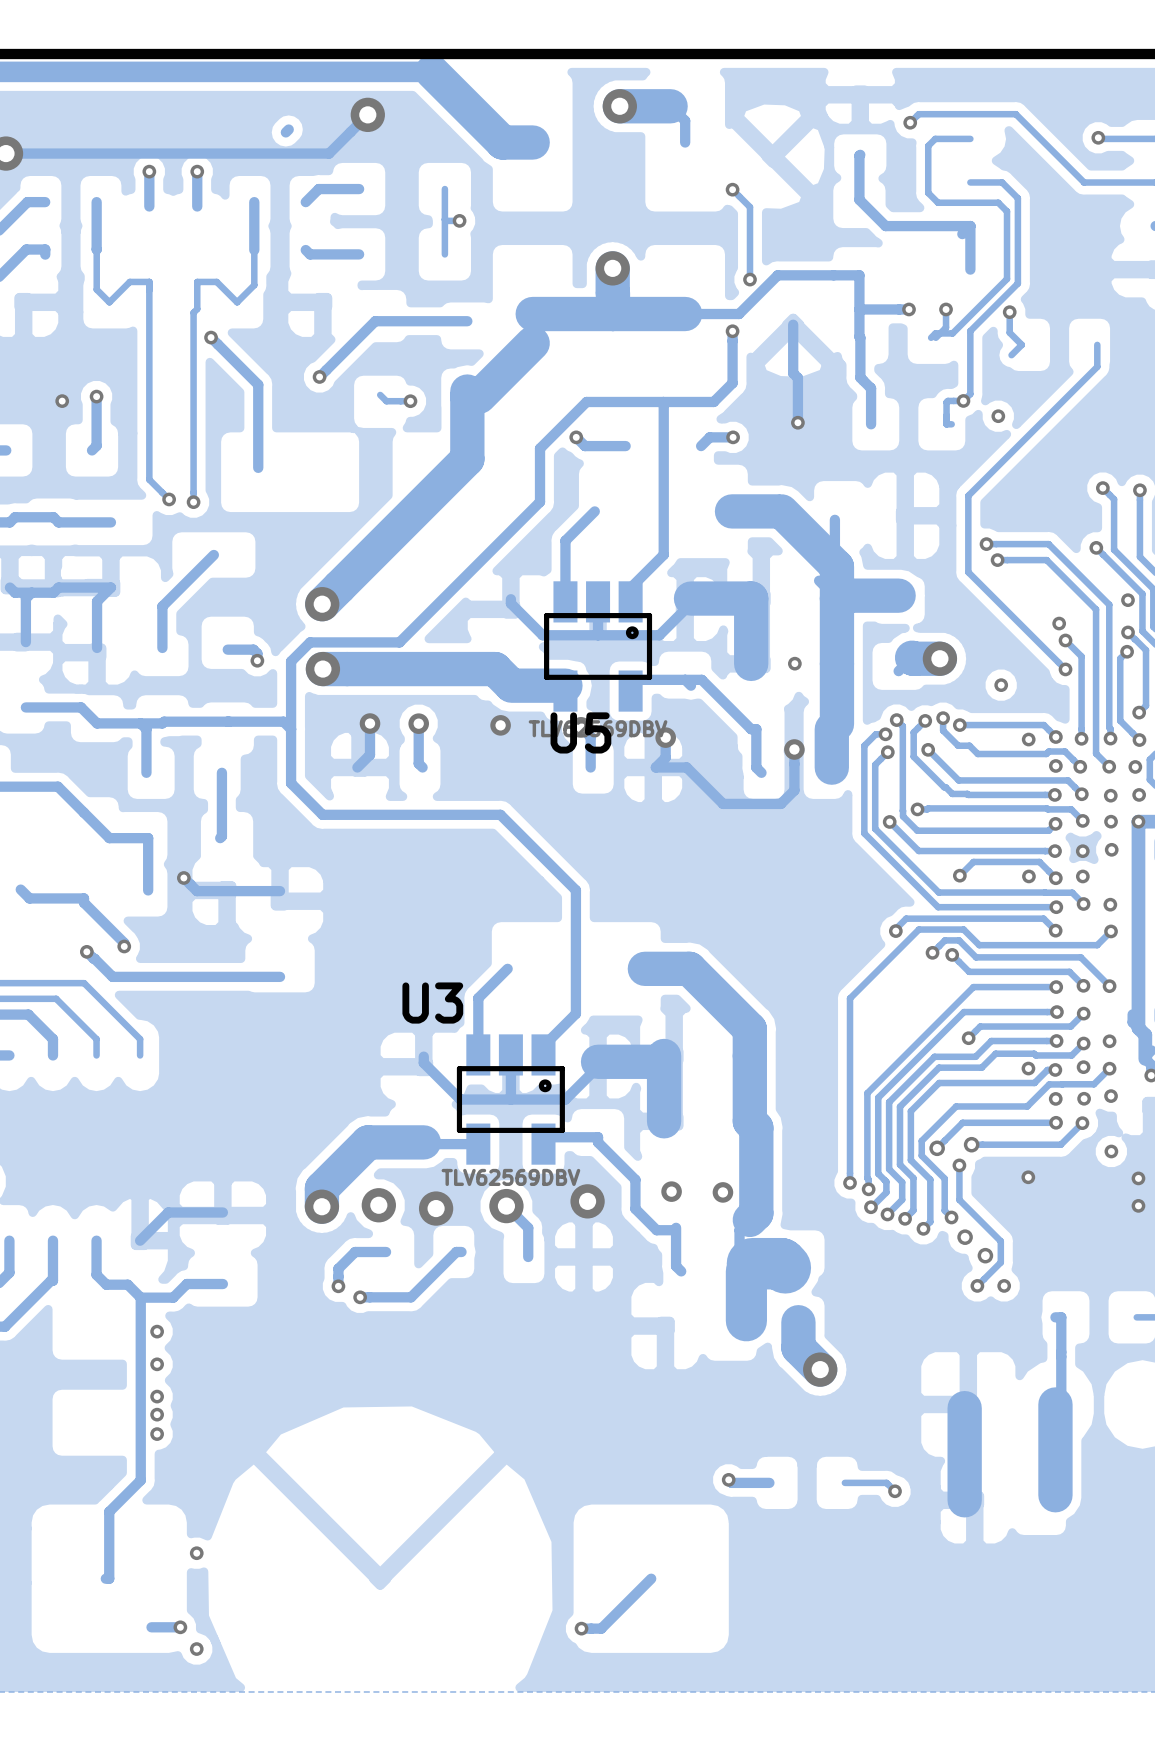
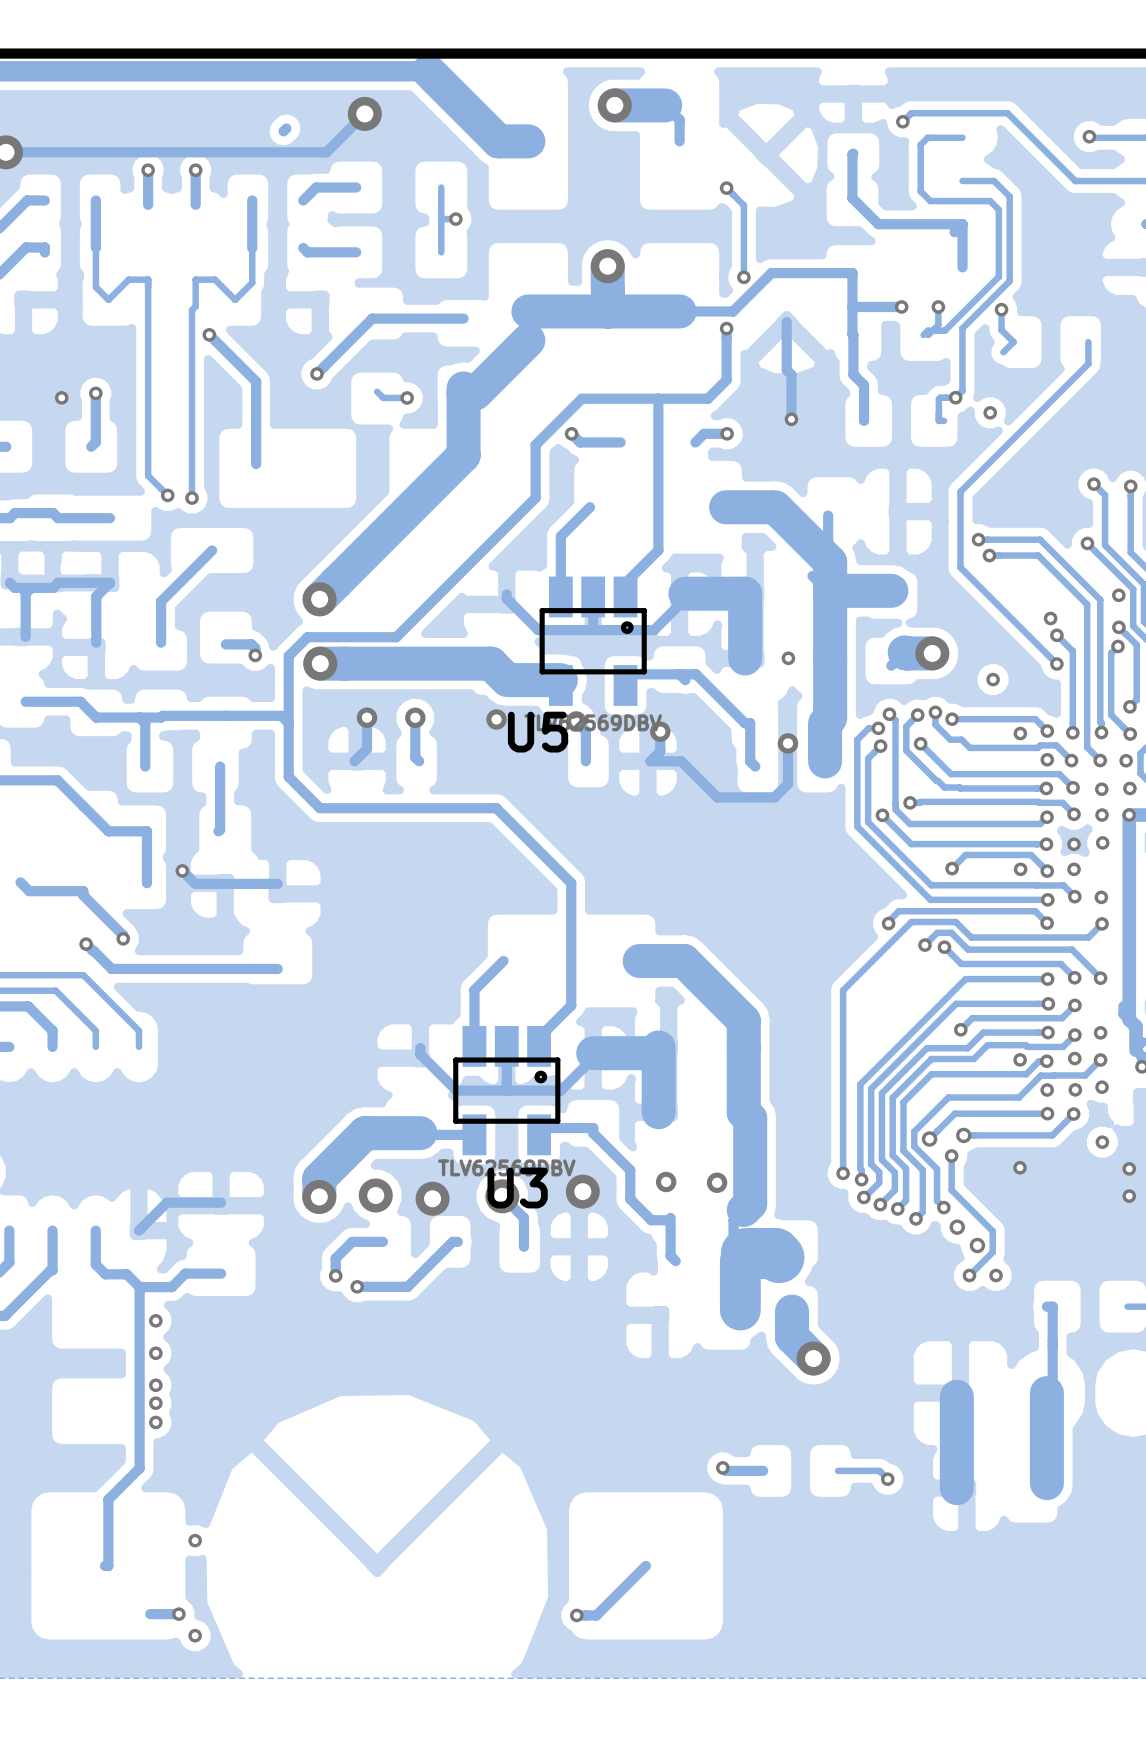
U5 name position: U5 (580, 732) -> U5 (538, 732)
U3 name position: U3 (432, 1003) -> U3 (517, 1188)

